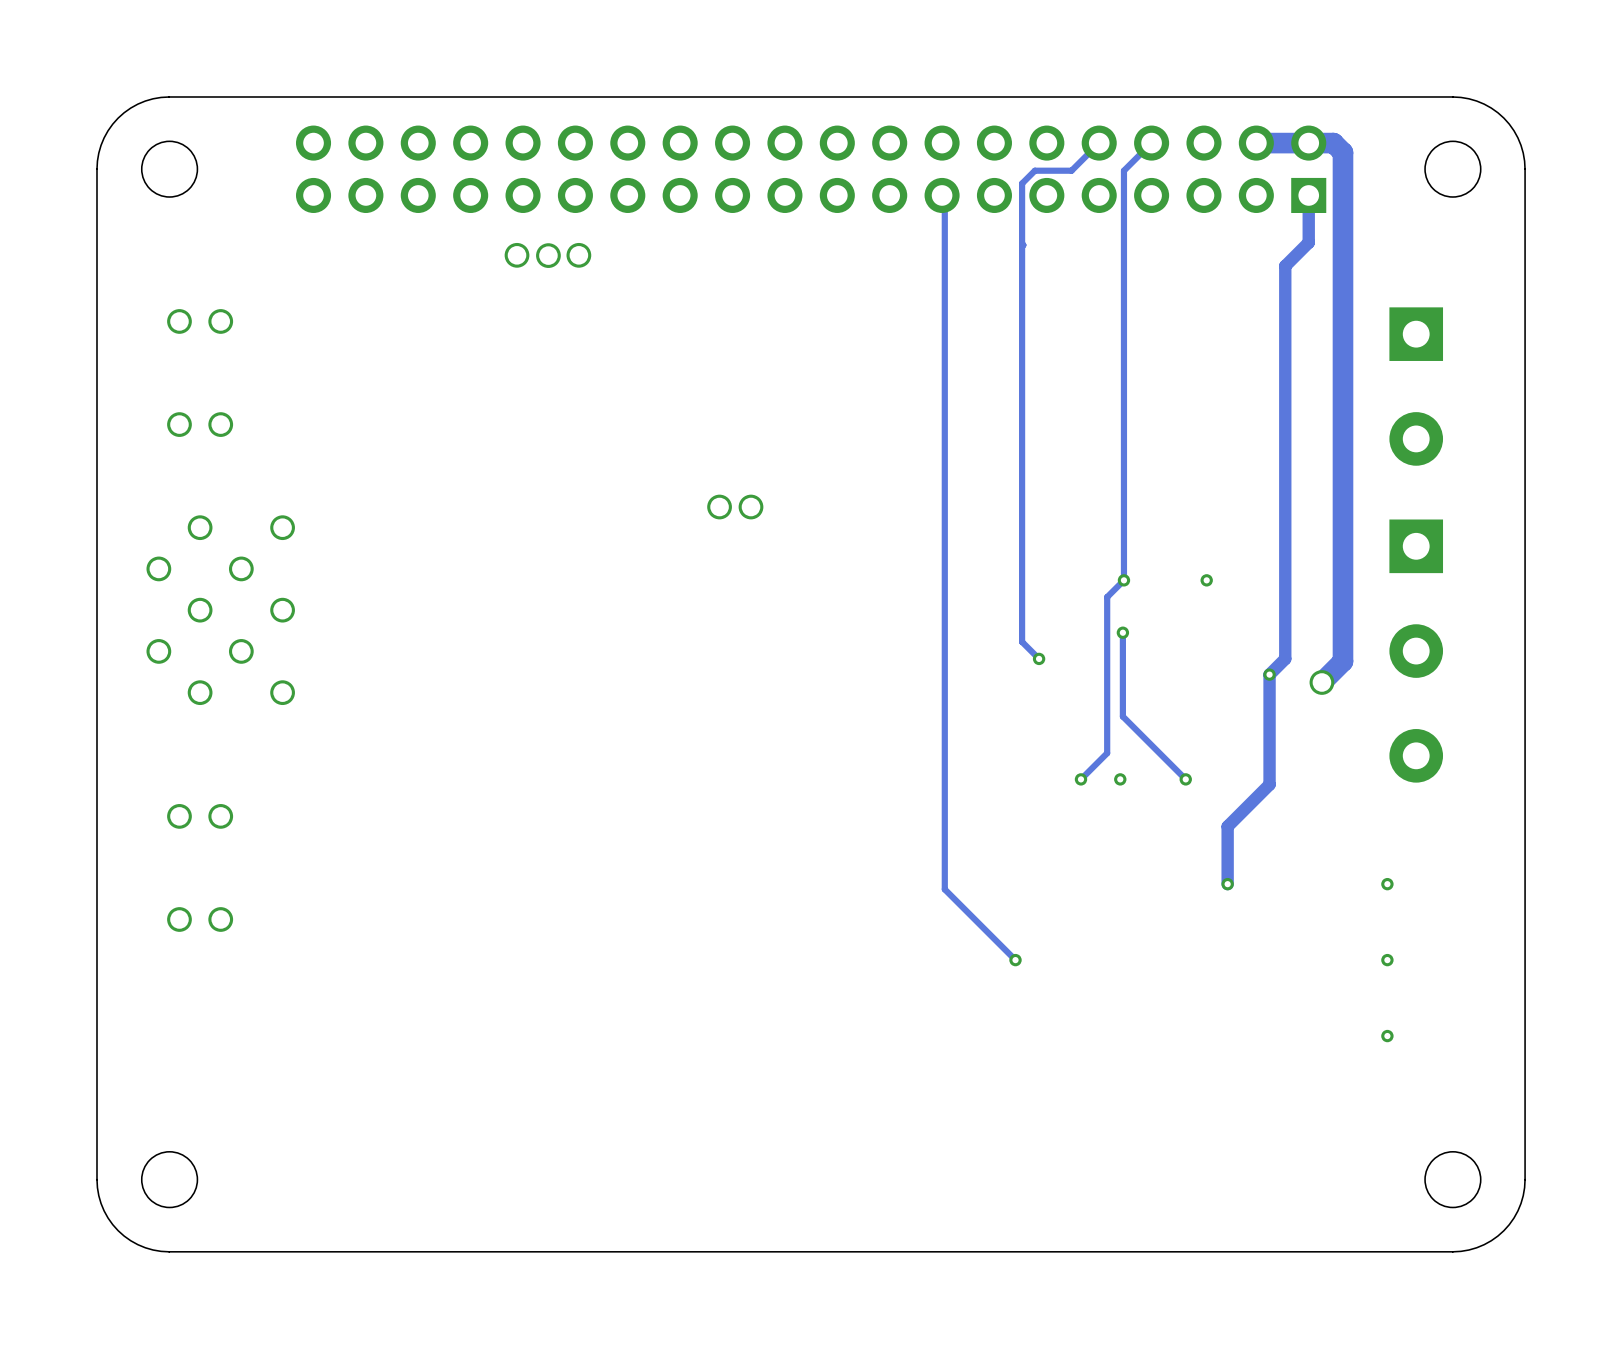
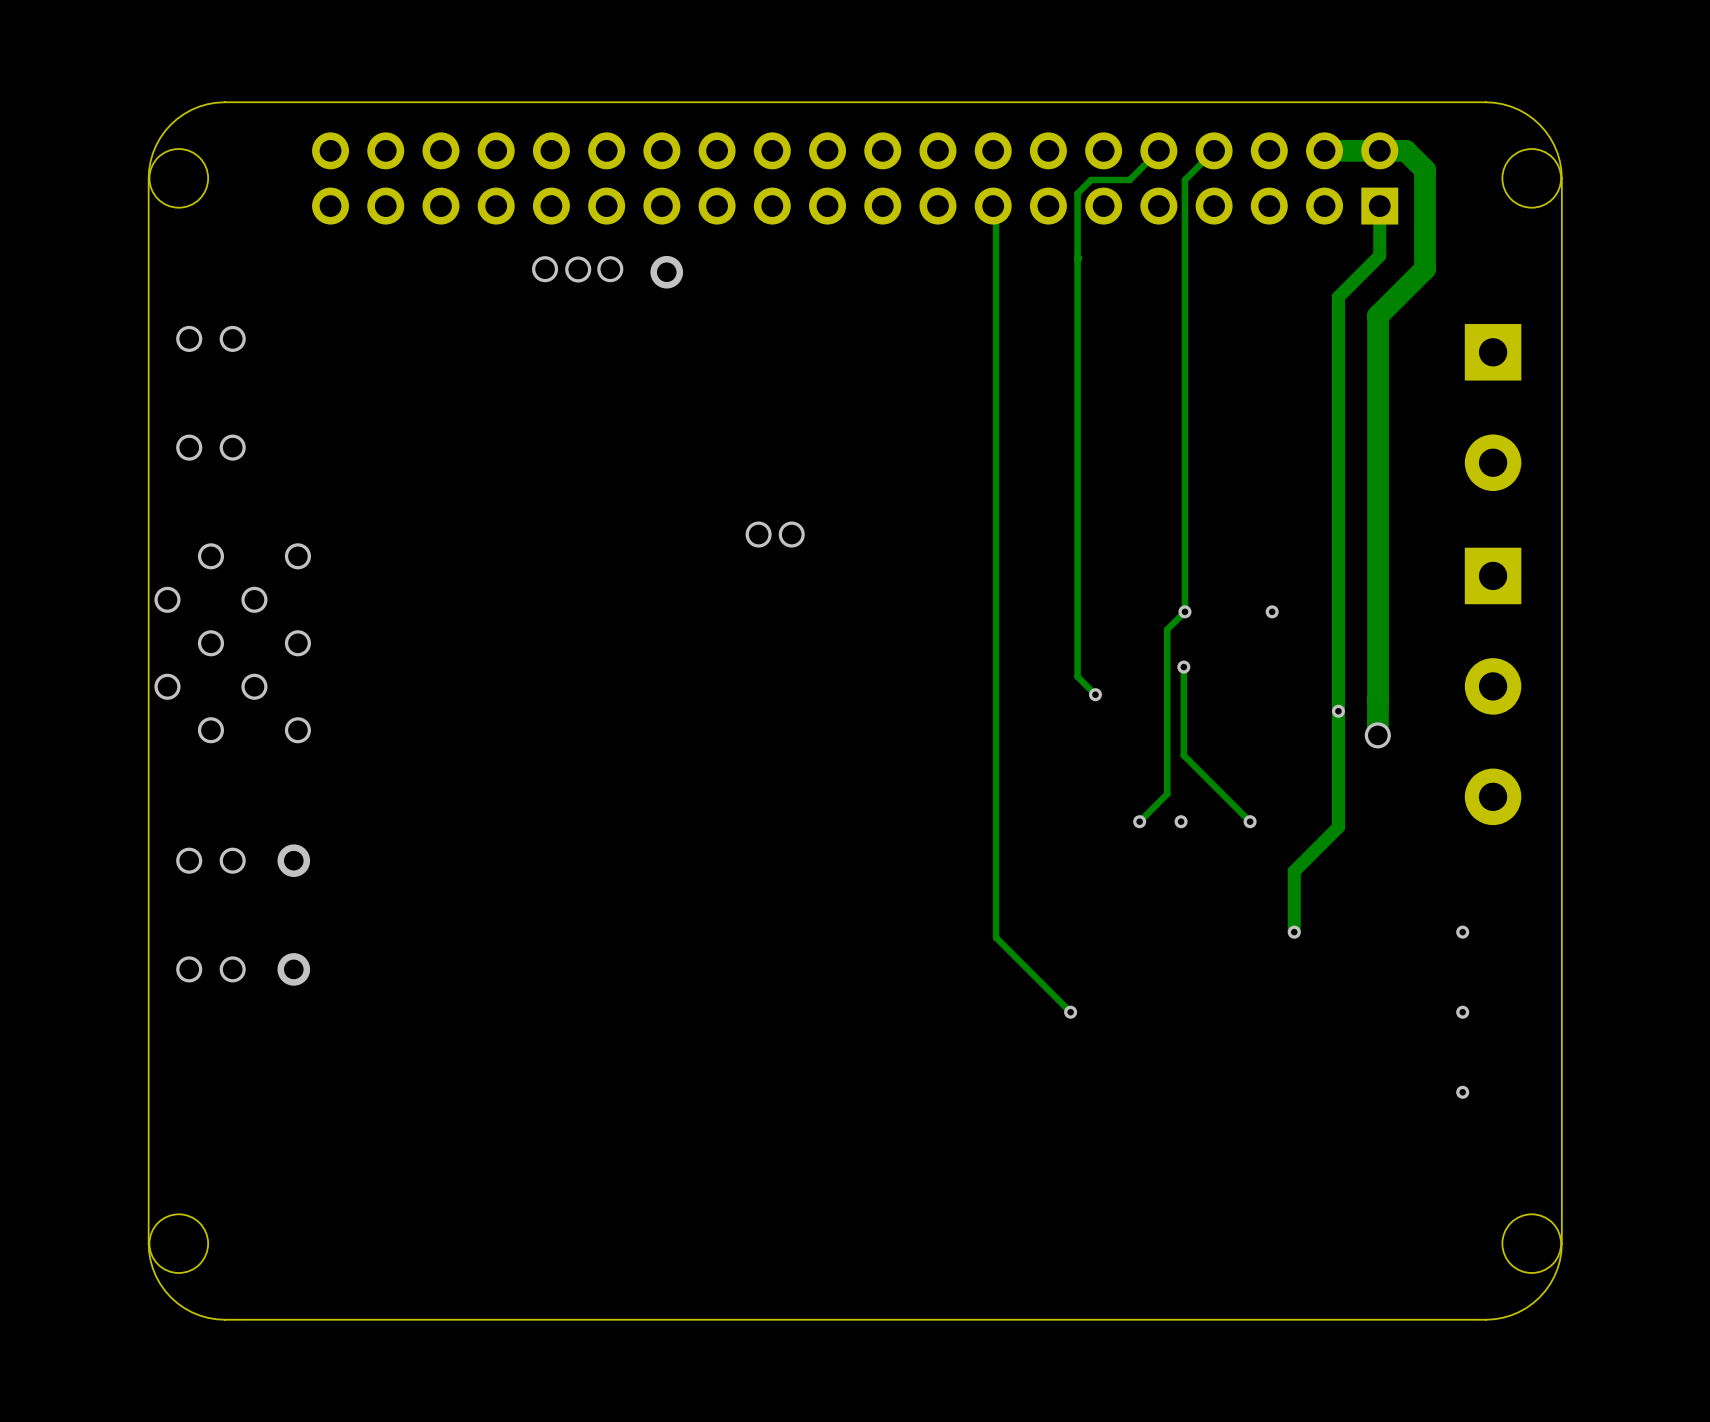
track: (1342, 152) (1342, 661) (1321, 682) -> (1415, 160) (1425, 169) (1425, 268) (1378, 315) (1377, 735)
board edge: none -> (1561, 178) (1561, 1252) (1554, 1276) (1545, 1291) (1533, 1303) (1510, 1315) (1485, 1319)
via: none -> (666, 272)
track: (1285, 266) (1285, 658) (1269, 674) -> (1355, 280) (1338, 297) (1338, 711)
via position: (1321, 682) -> (1377, 735)
via: none -> (293, 860)
via: none -> (293, 969)
board edge: (1409, 1251) (1460, 1251) (1476, 1247) (1491, 1240) (1503, 1230) (1513, 1218) (1521, 1203) (1524, 1187) (1525, 169) (1523, 153) (1517, 137) (1503, 118) (1484, 104) (1468, 98) (1452, 96) (169, 96) (145, 101) (130, 108) (118, 118) (104, 137) (97, 161) (96, 1179) (101, 1203) (108, 1218) (118, 1230) (130, 1240) (145, 1247) (161, 1251) (213, 1251) -> (1561, 178) (1559, 161) (1554, 145) (1539, 124) (1518, 109) (1502, 104) (1485, 102) (224, 102) (199, 106) (177, 118) (165, 130) (156, 145) (150, 161) (148, 178) (148, 1243) (150, 1260) (156, 1276) (170, 1297) (191, 1312) (207, 1317) (224, 1319)

